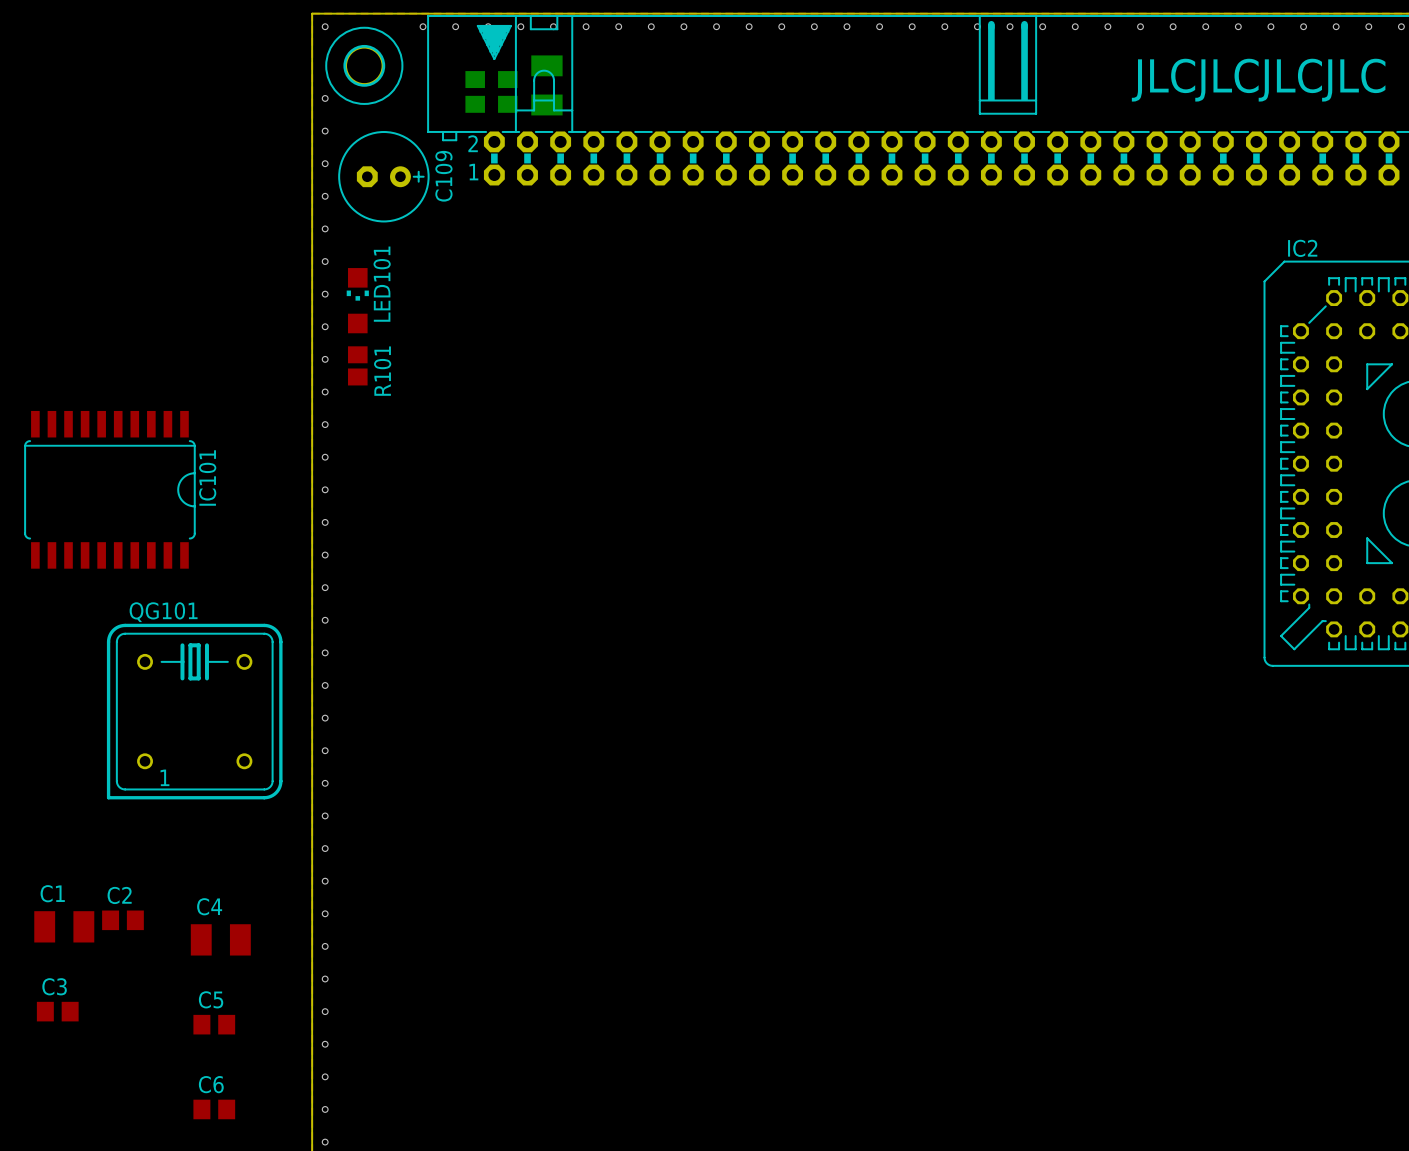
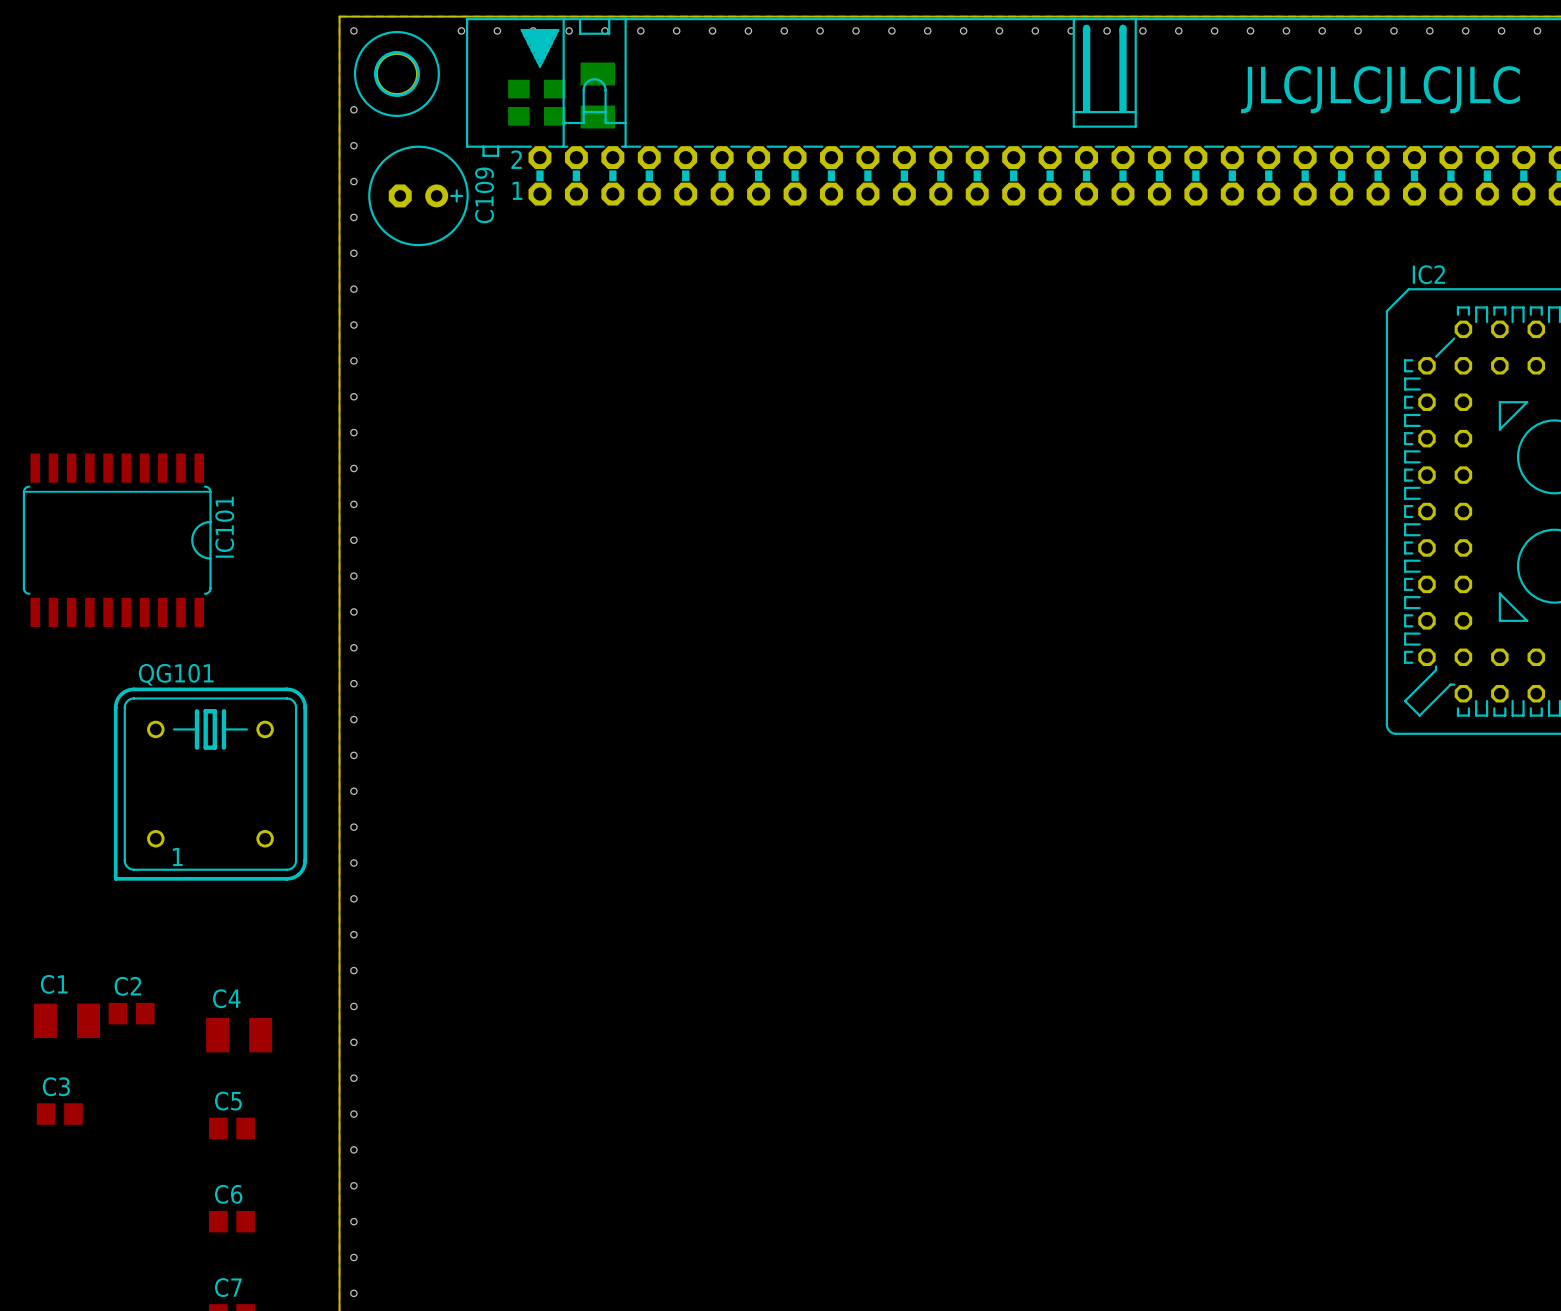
LED101: (357, 300) -> none
R101: (357, 365) -> none

